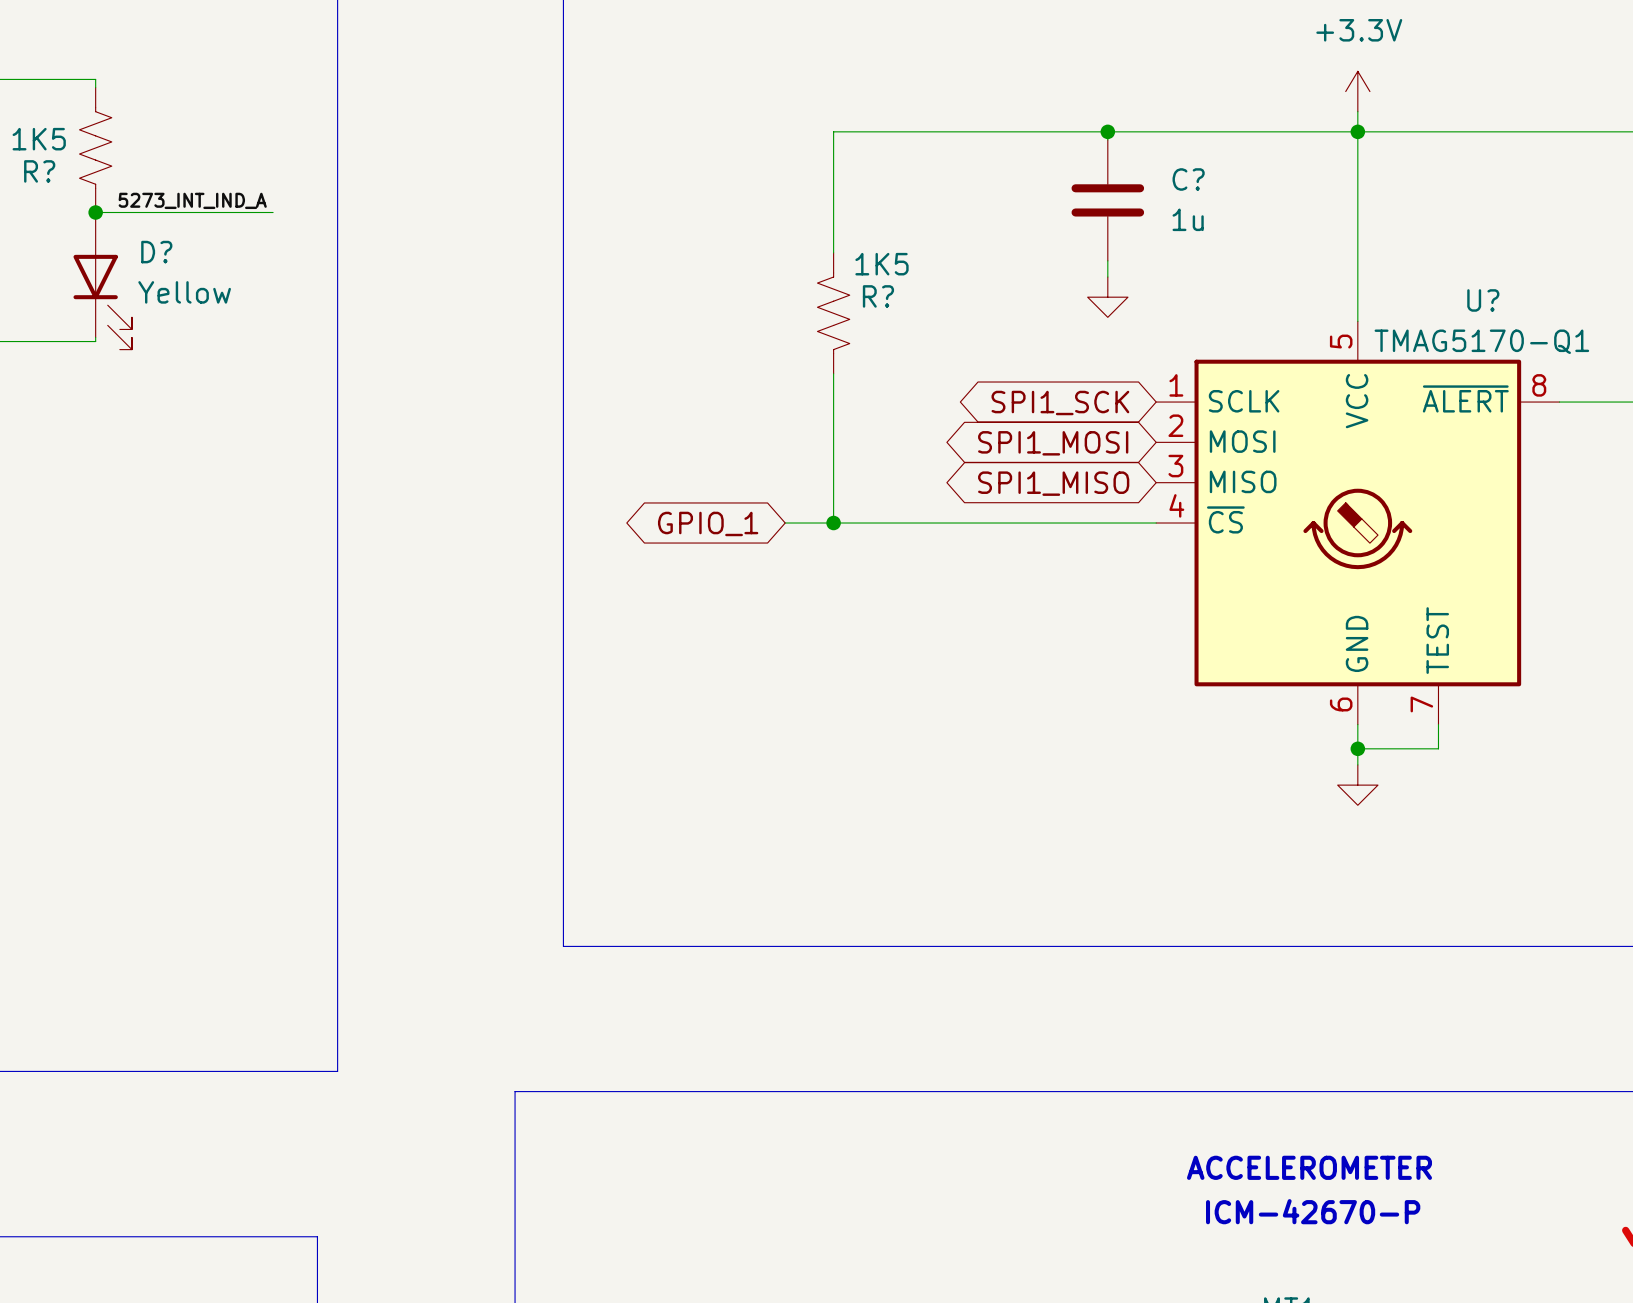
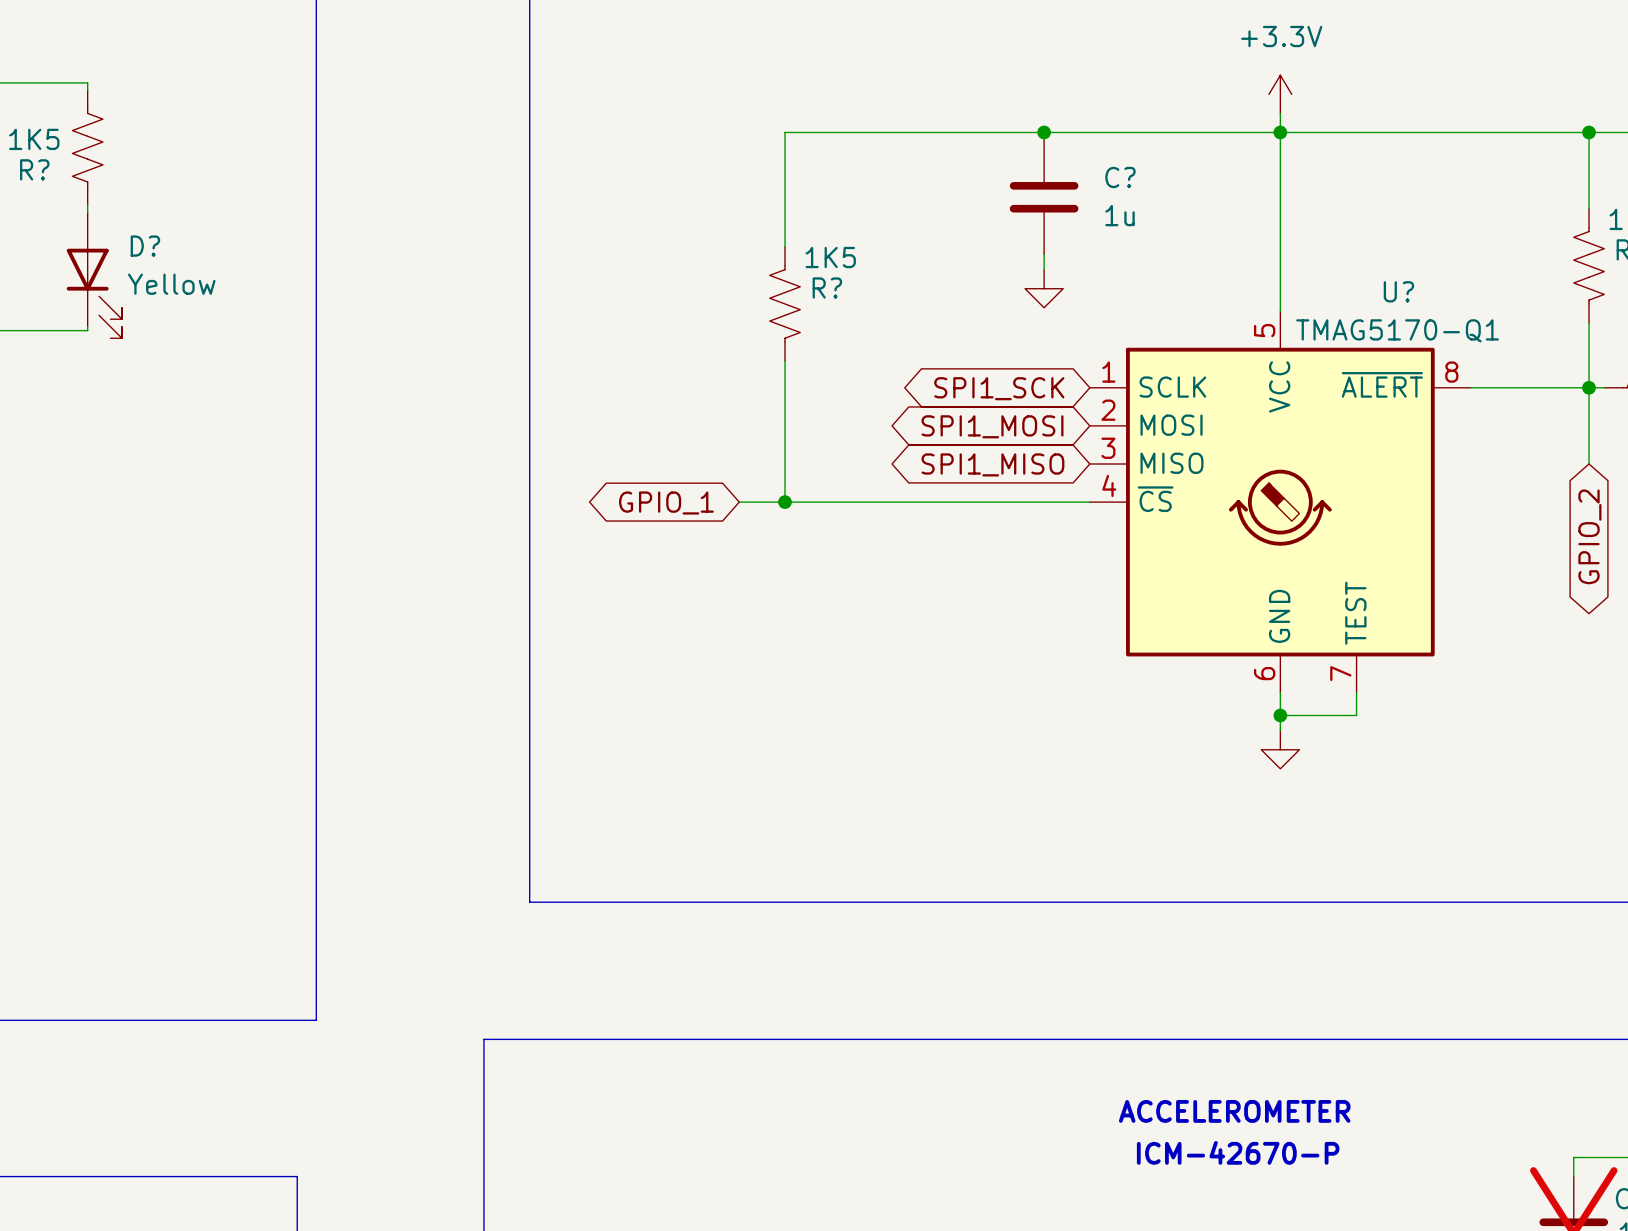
label: 5273_INT_IND_A (192, 200) -> none
wire: (95, 212) (273, 212) -> none
junction: (95, 212) -> none

